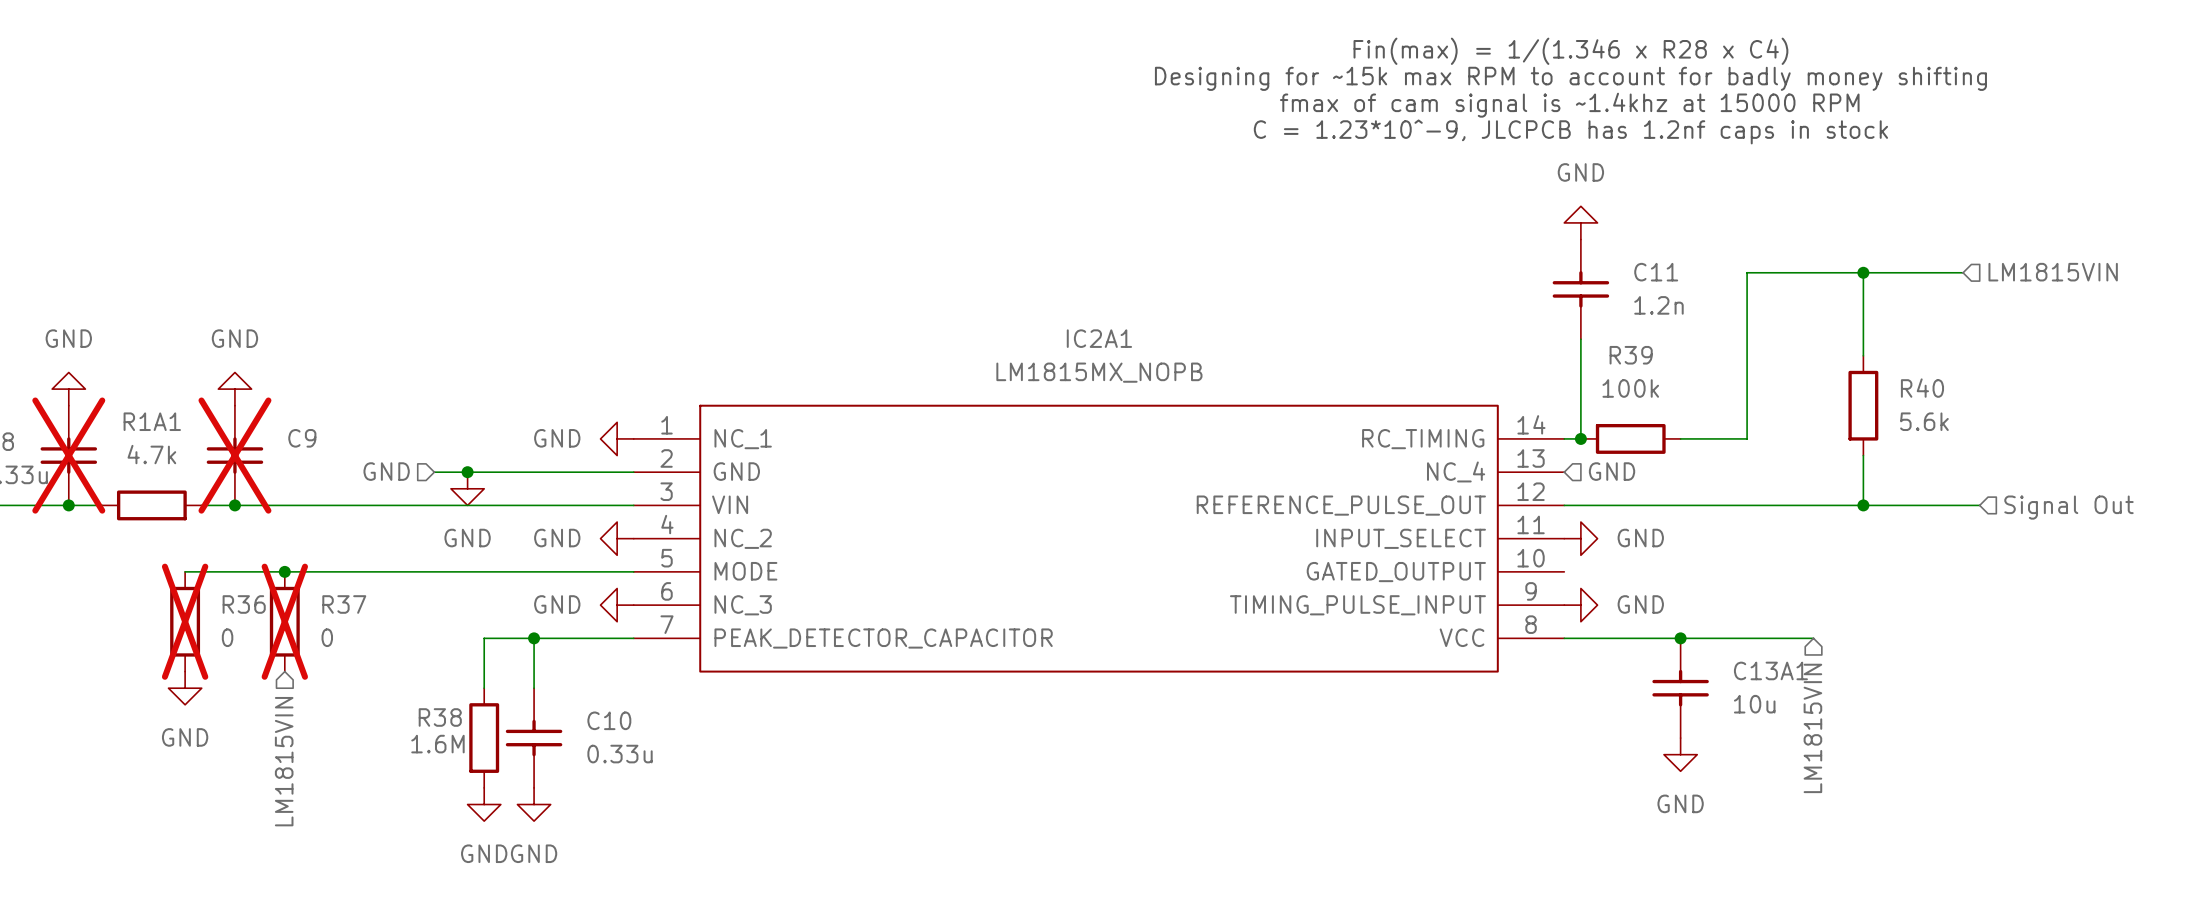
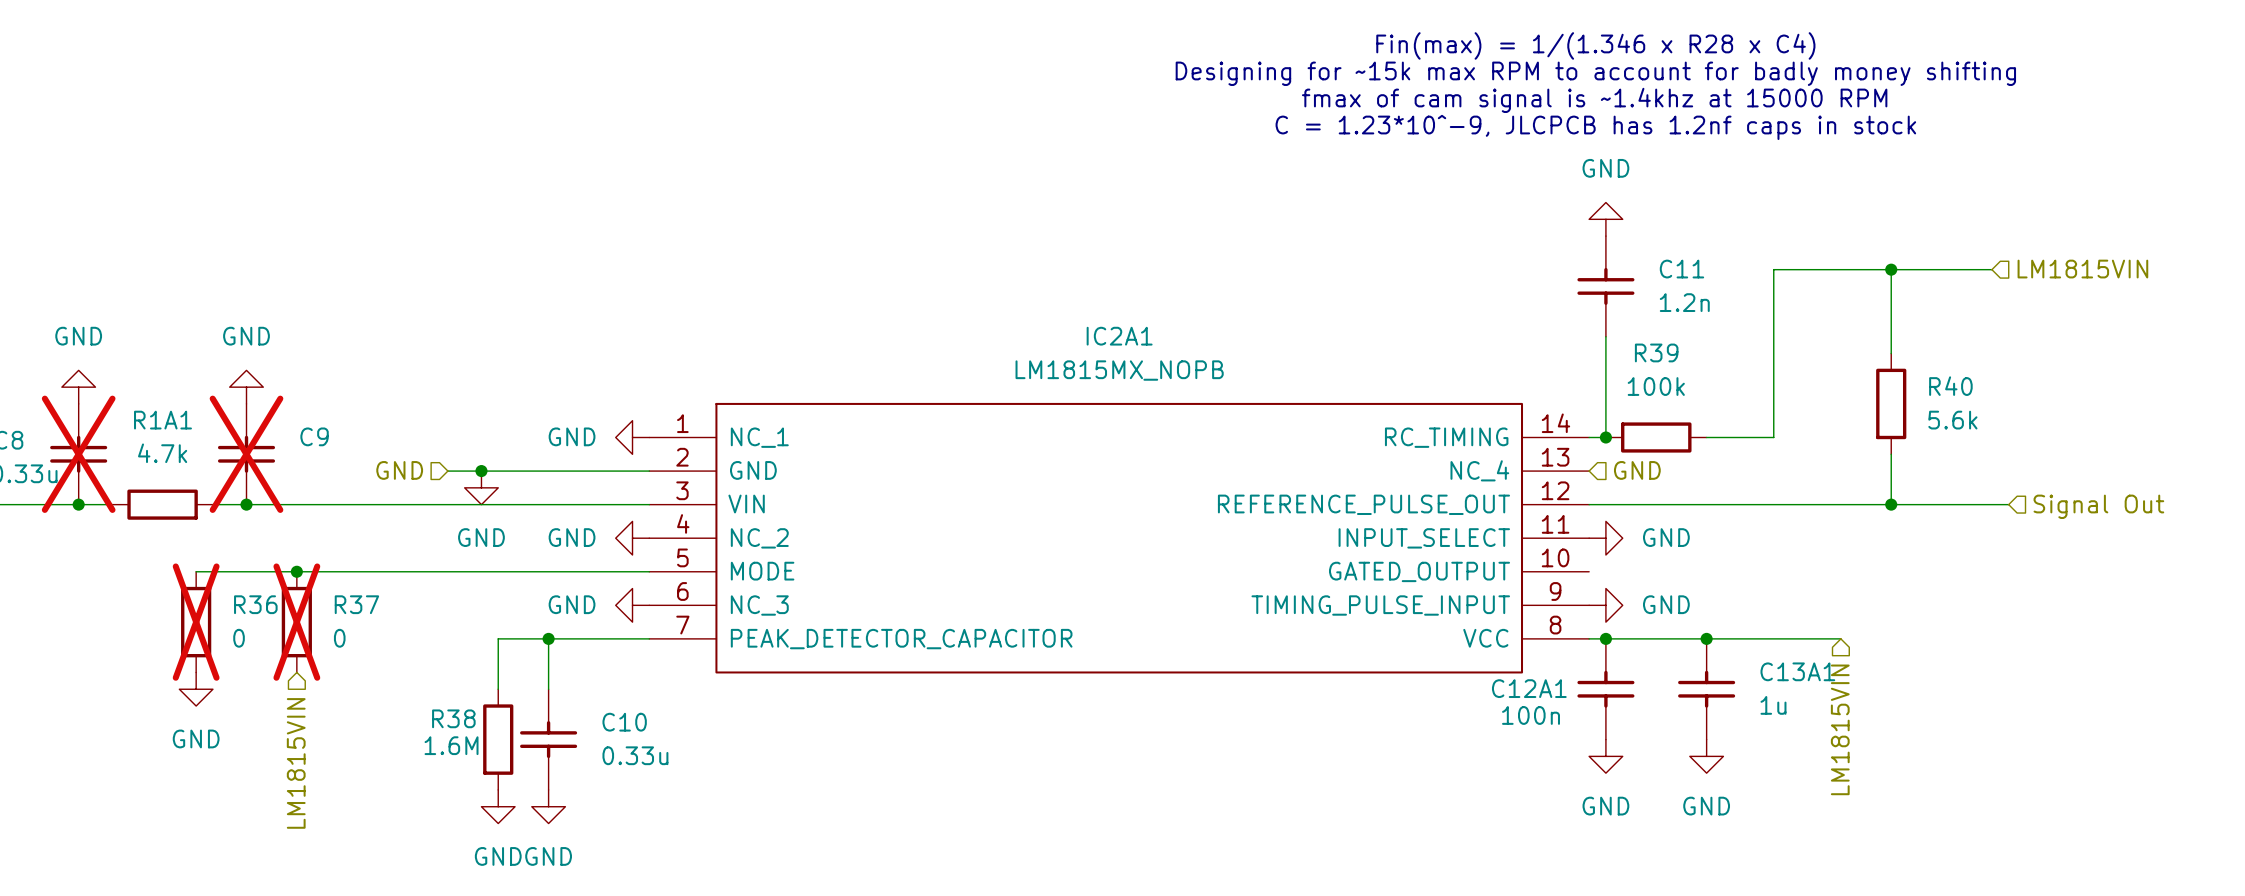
junction: none -> (1605, 638)
C12A1: none -> 100n (1605, 689)
C13A1 value: 10u (1754, 704) -> 1u (1773, 705)
power symbol: none -> GND (1605, 756)

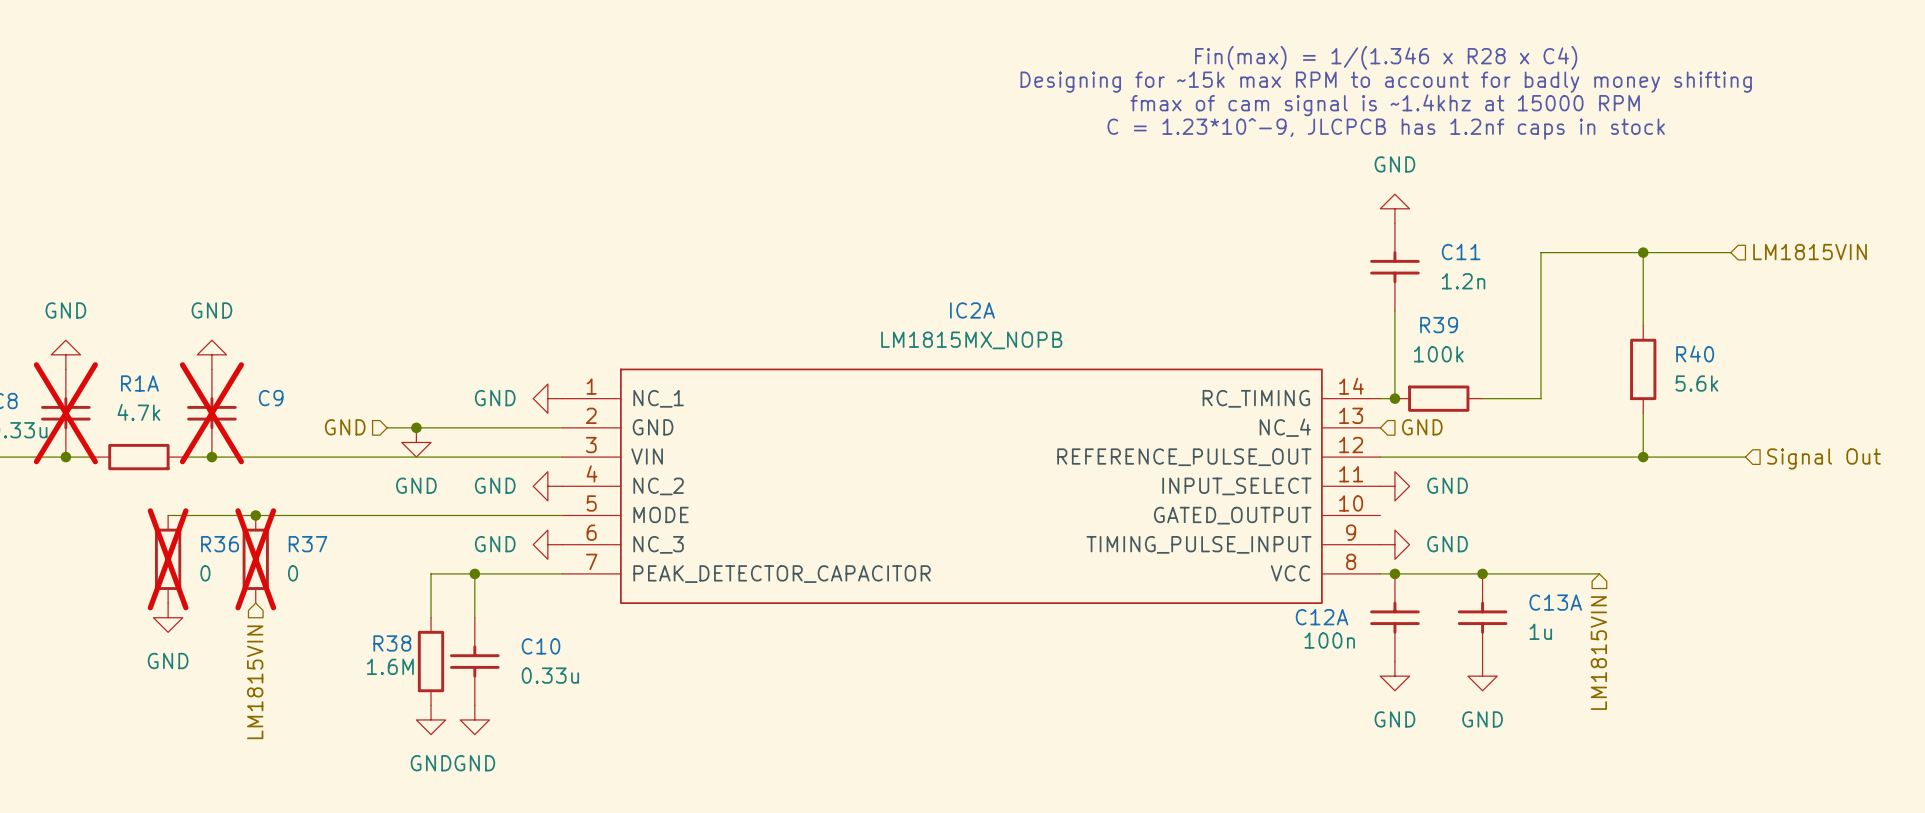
IC2A1 name: IC2A1 (1119, 336) -> IC2A (972, 310)
R1A1 name: R1A1 (162, 420) -> R1A (139, 383)
C13A1 name: C13A1 (1797, 671) -> C13A (1555, 602)
C12A1 name: C12A1 (1529, 688) -> C12A (1322, 617)

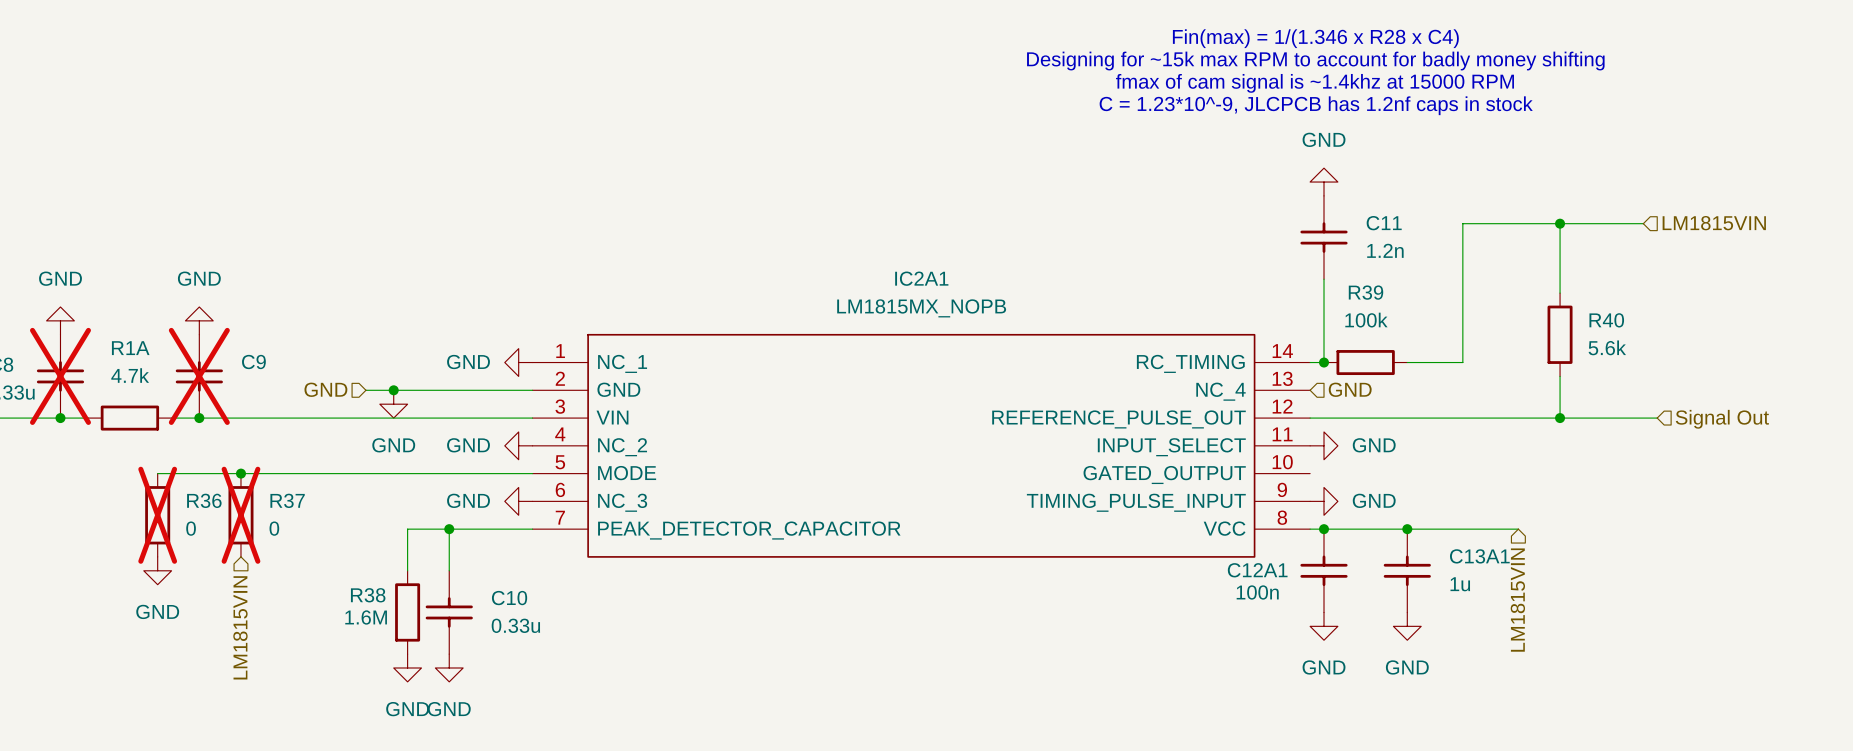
IC2A name: IC2A (972, 310) -> IC2A1 (921, 278)
C13A name: C13A (1555, 602) -> C13A1 (1479, 556)
C12A name: C12A (1322, 617) -> C12A1 (1257, 570)

